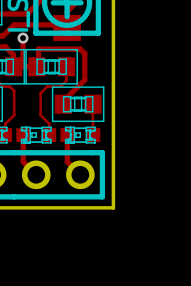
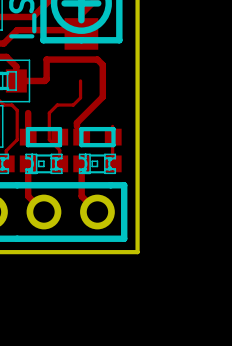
track: (23, 38) (23, 66) -> none
via: (23, 38) -> none
part: (51, 66) -> none
part footprint: [52, 86, 105, 122] -> [73, 126, 122, 148]
track: none -> (28, 113) (28, 137)
part: none -> (43, 137)

